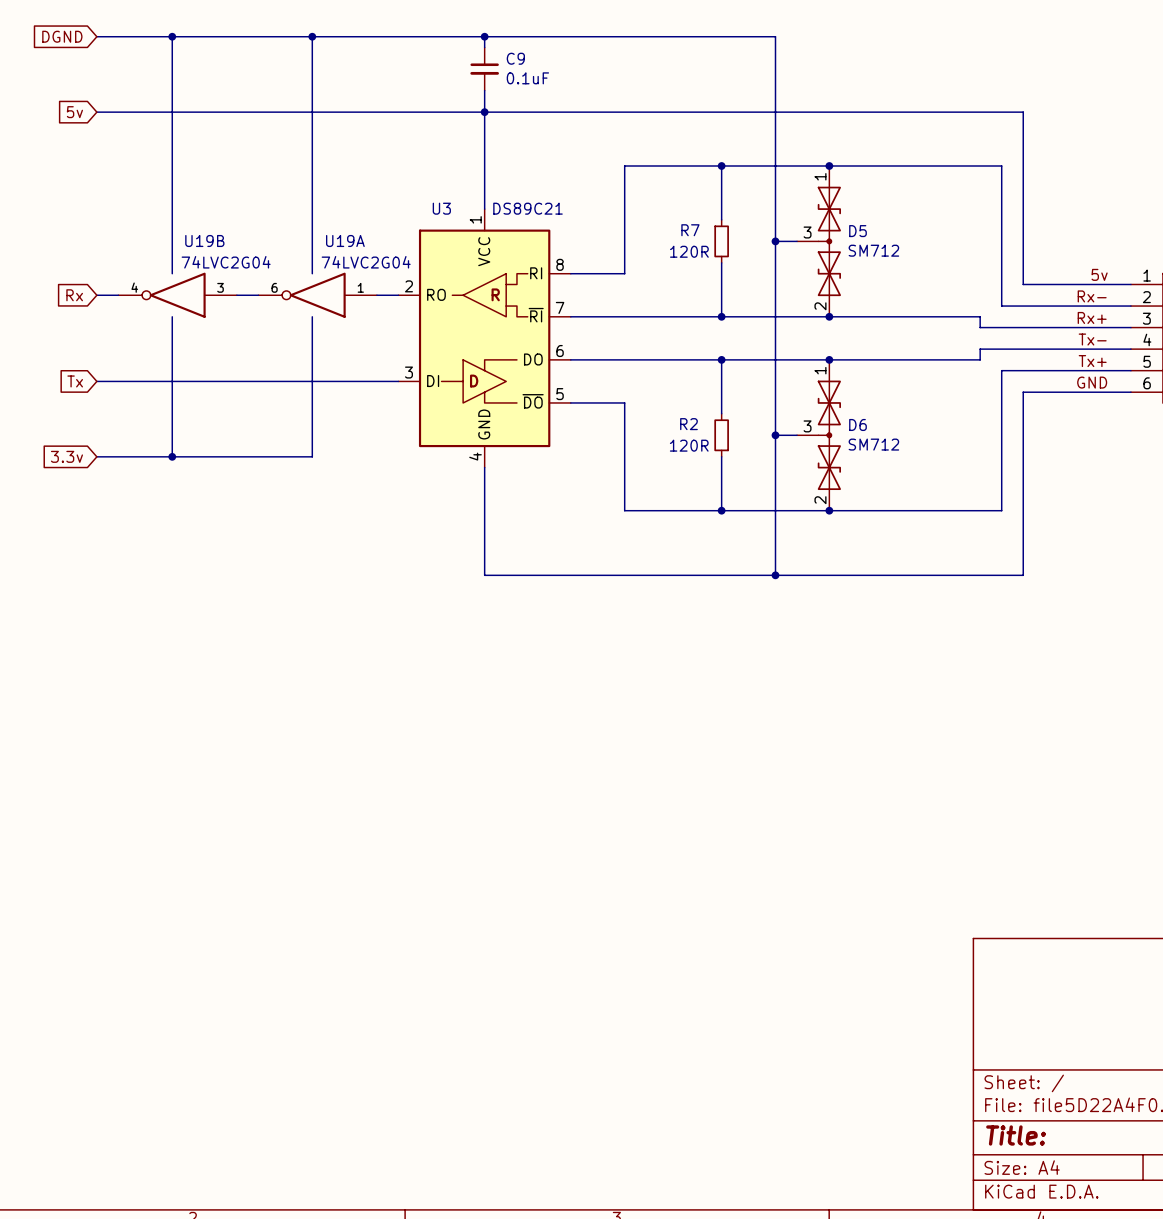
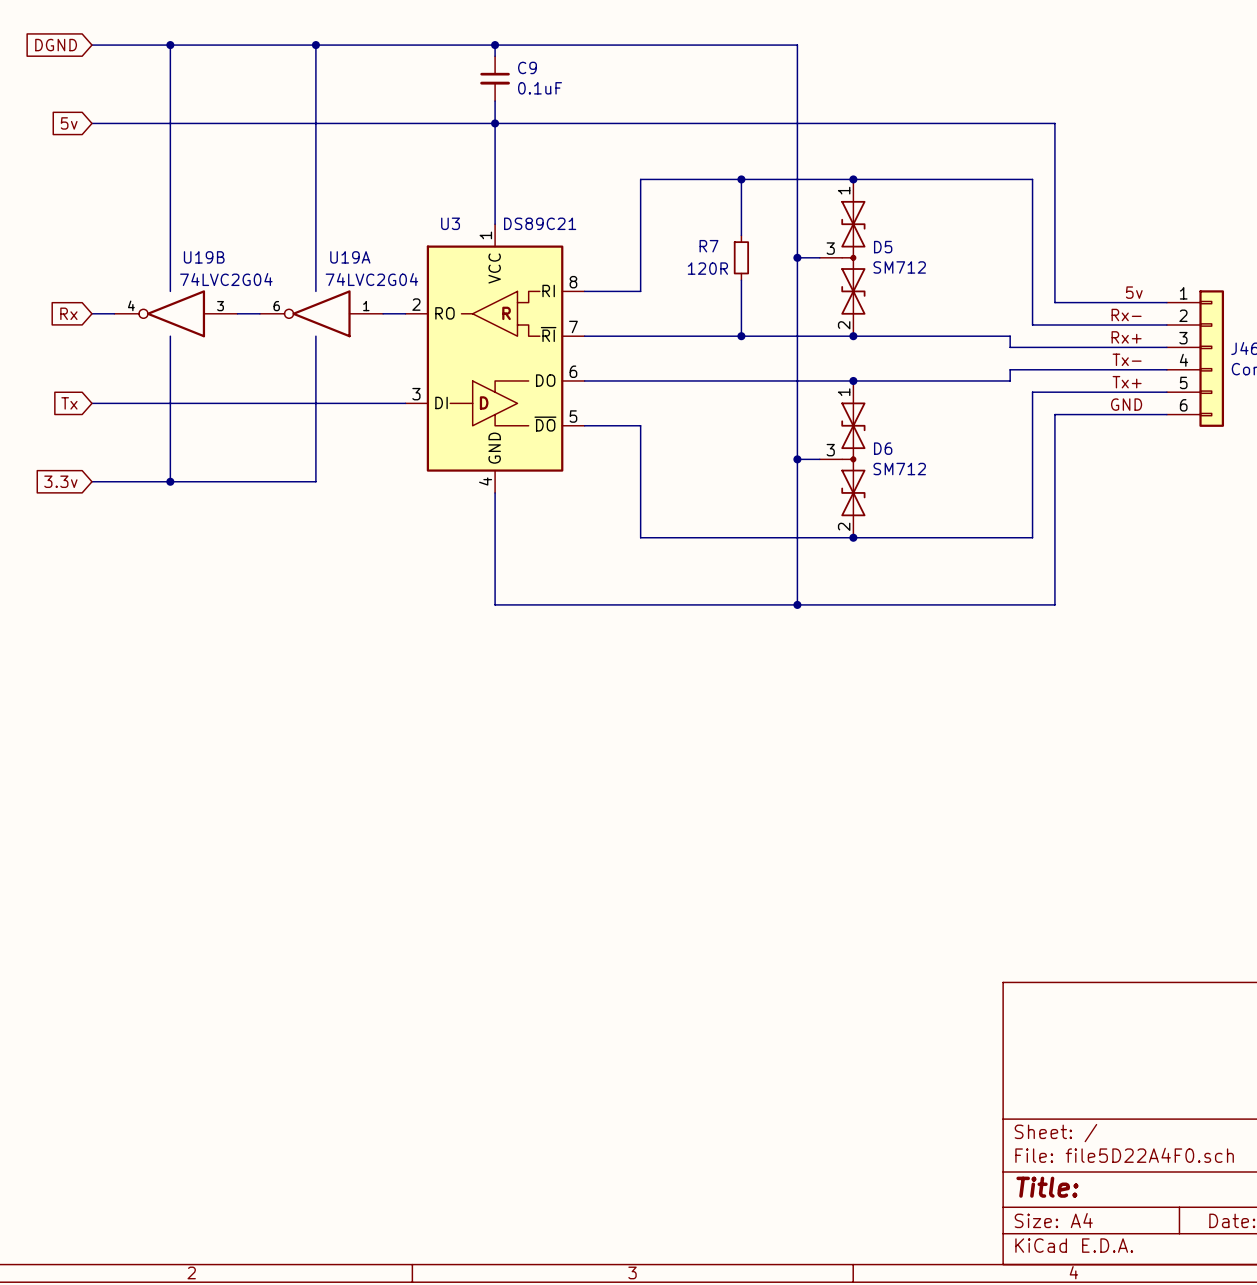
wire: (721, 359) (721, 413) -> none
junction: (721, 359) -> none
R2: 120R (721, 435) -> none
wire: (721, 456) (721, 510) -> none
junction: (721, 510) -> none

